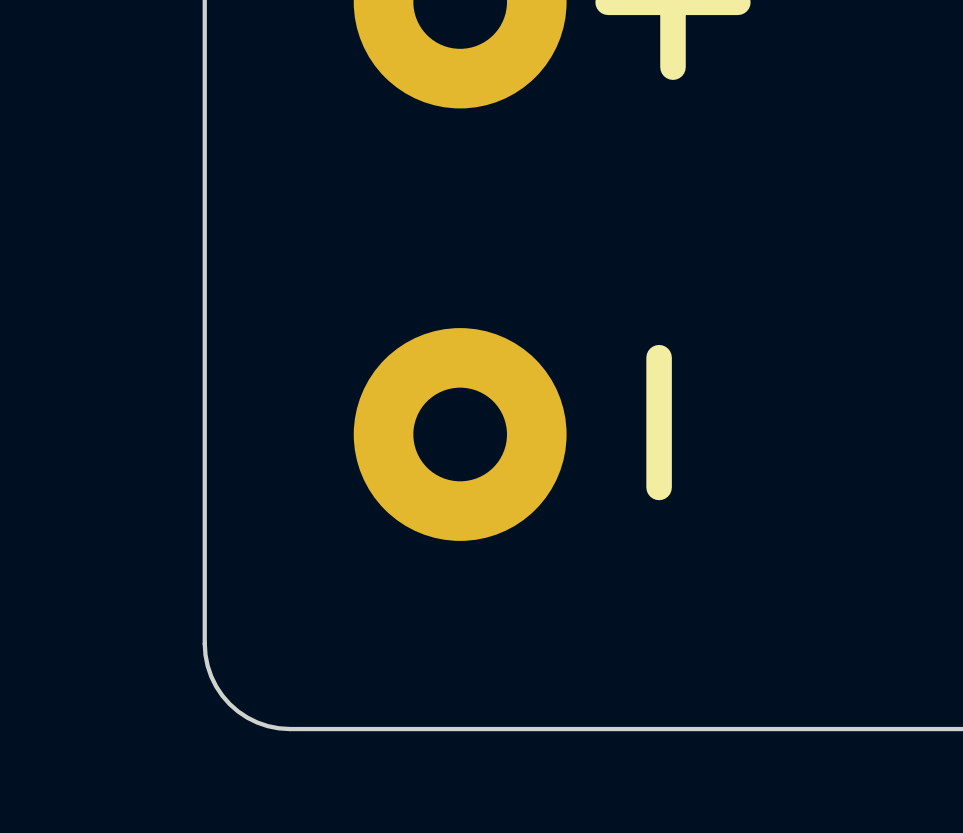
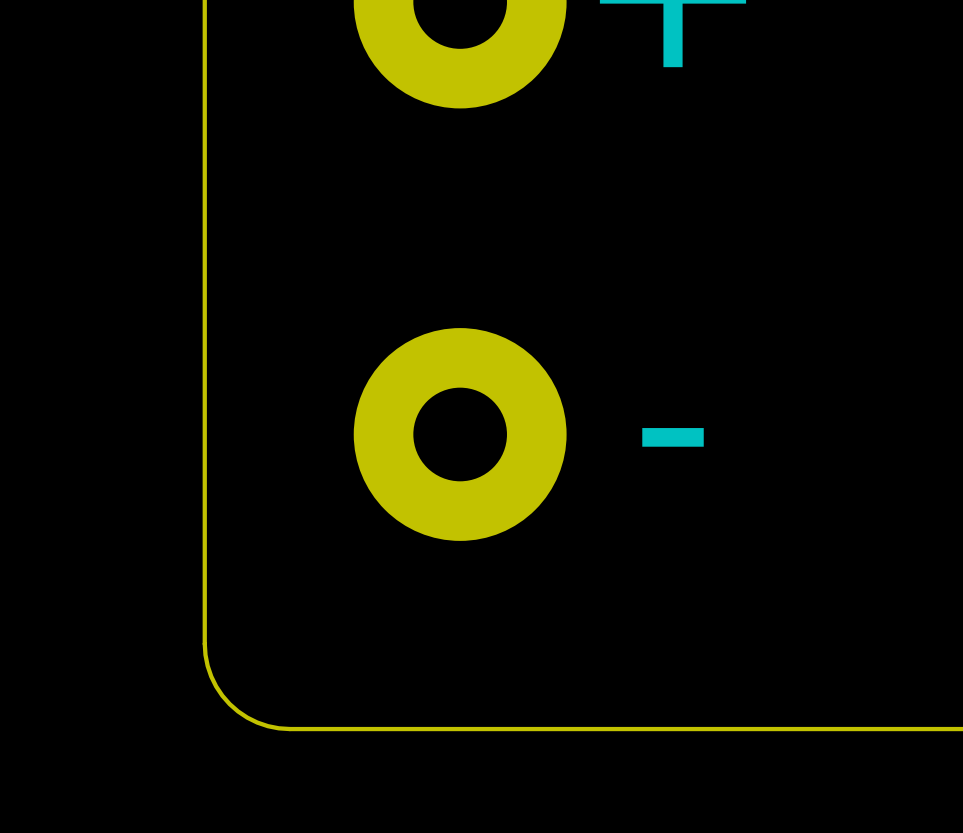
text rotation: 0° (659, 422) -> 90° counterclockwise (673, 437)

